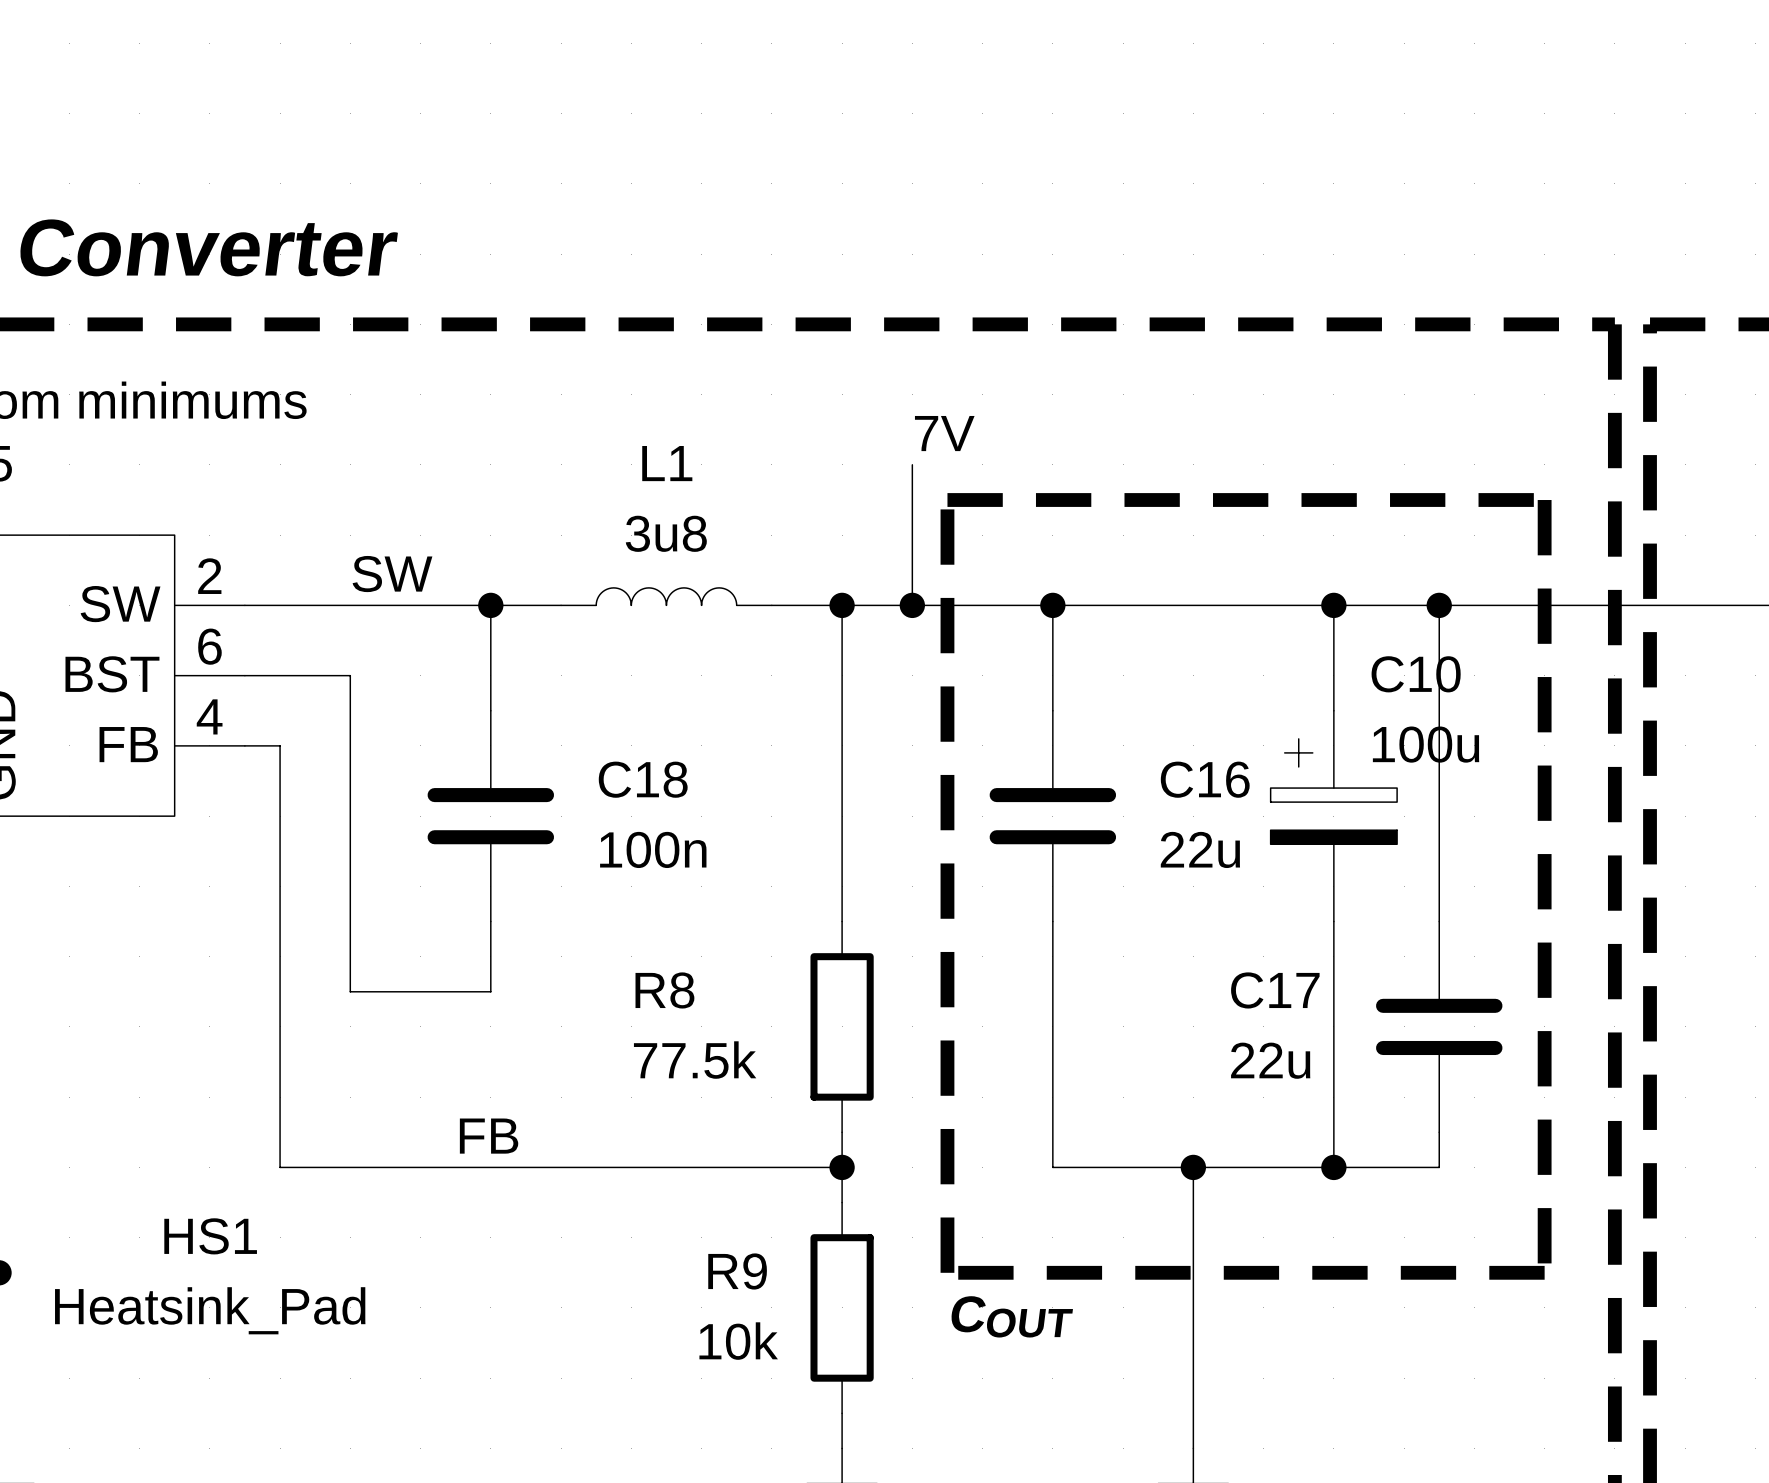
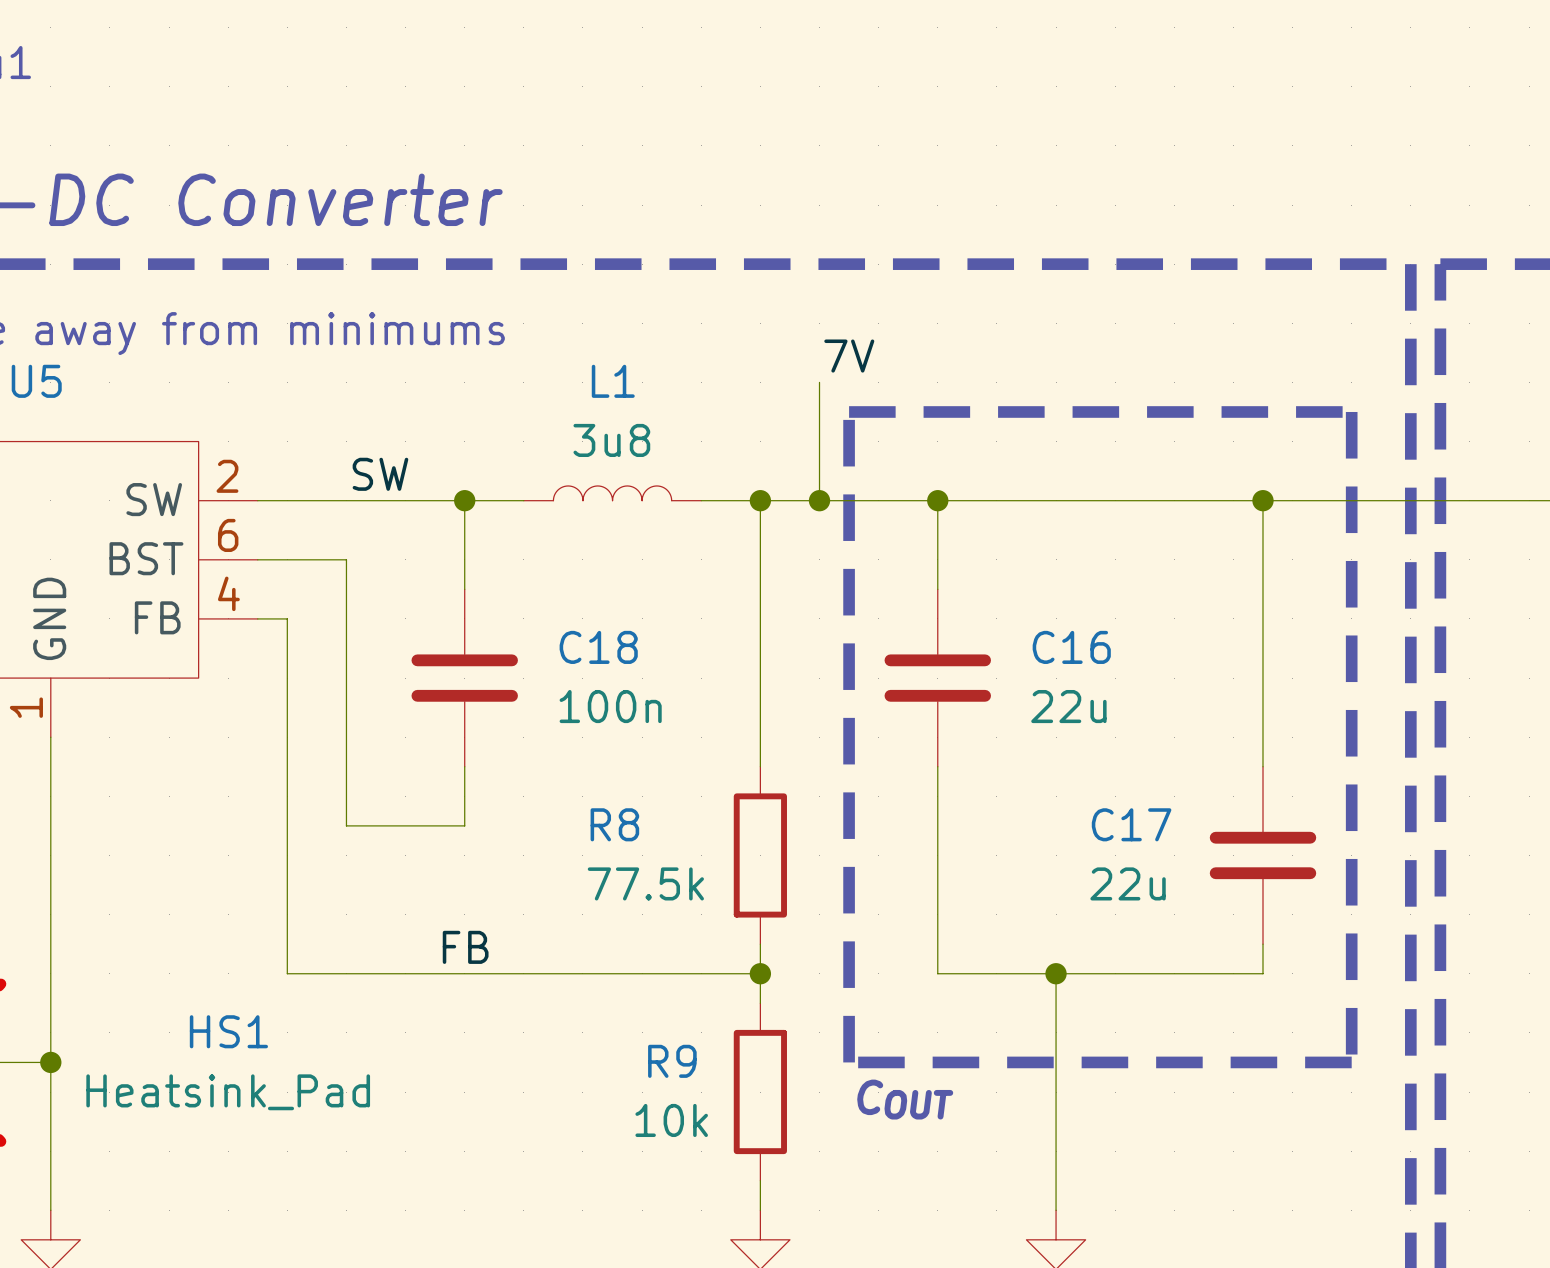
wire: (1333, 605) (1333, 710) -> none
junction: (1333, 605) -> none
C10: 100u (1333, 816) -> none
wire: (1333, 921) (1333, 1167) -> none
junction: (1333, 1167) -> none

